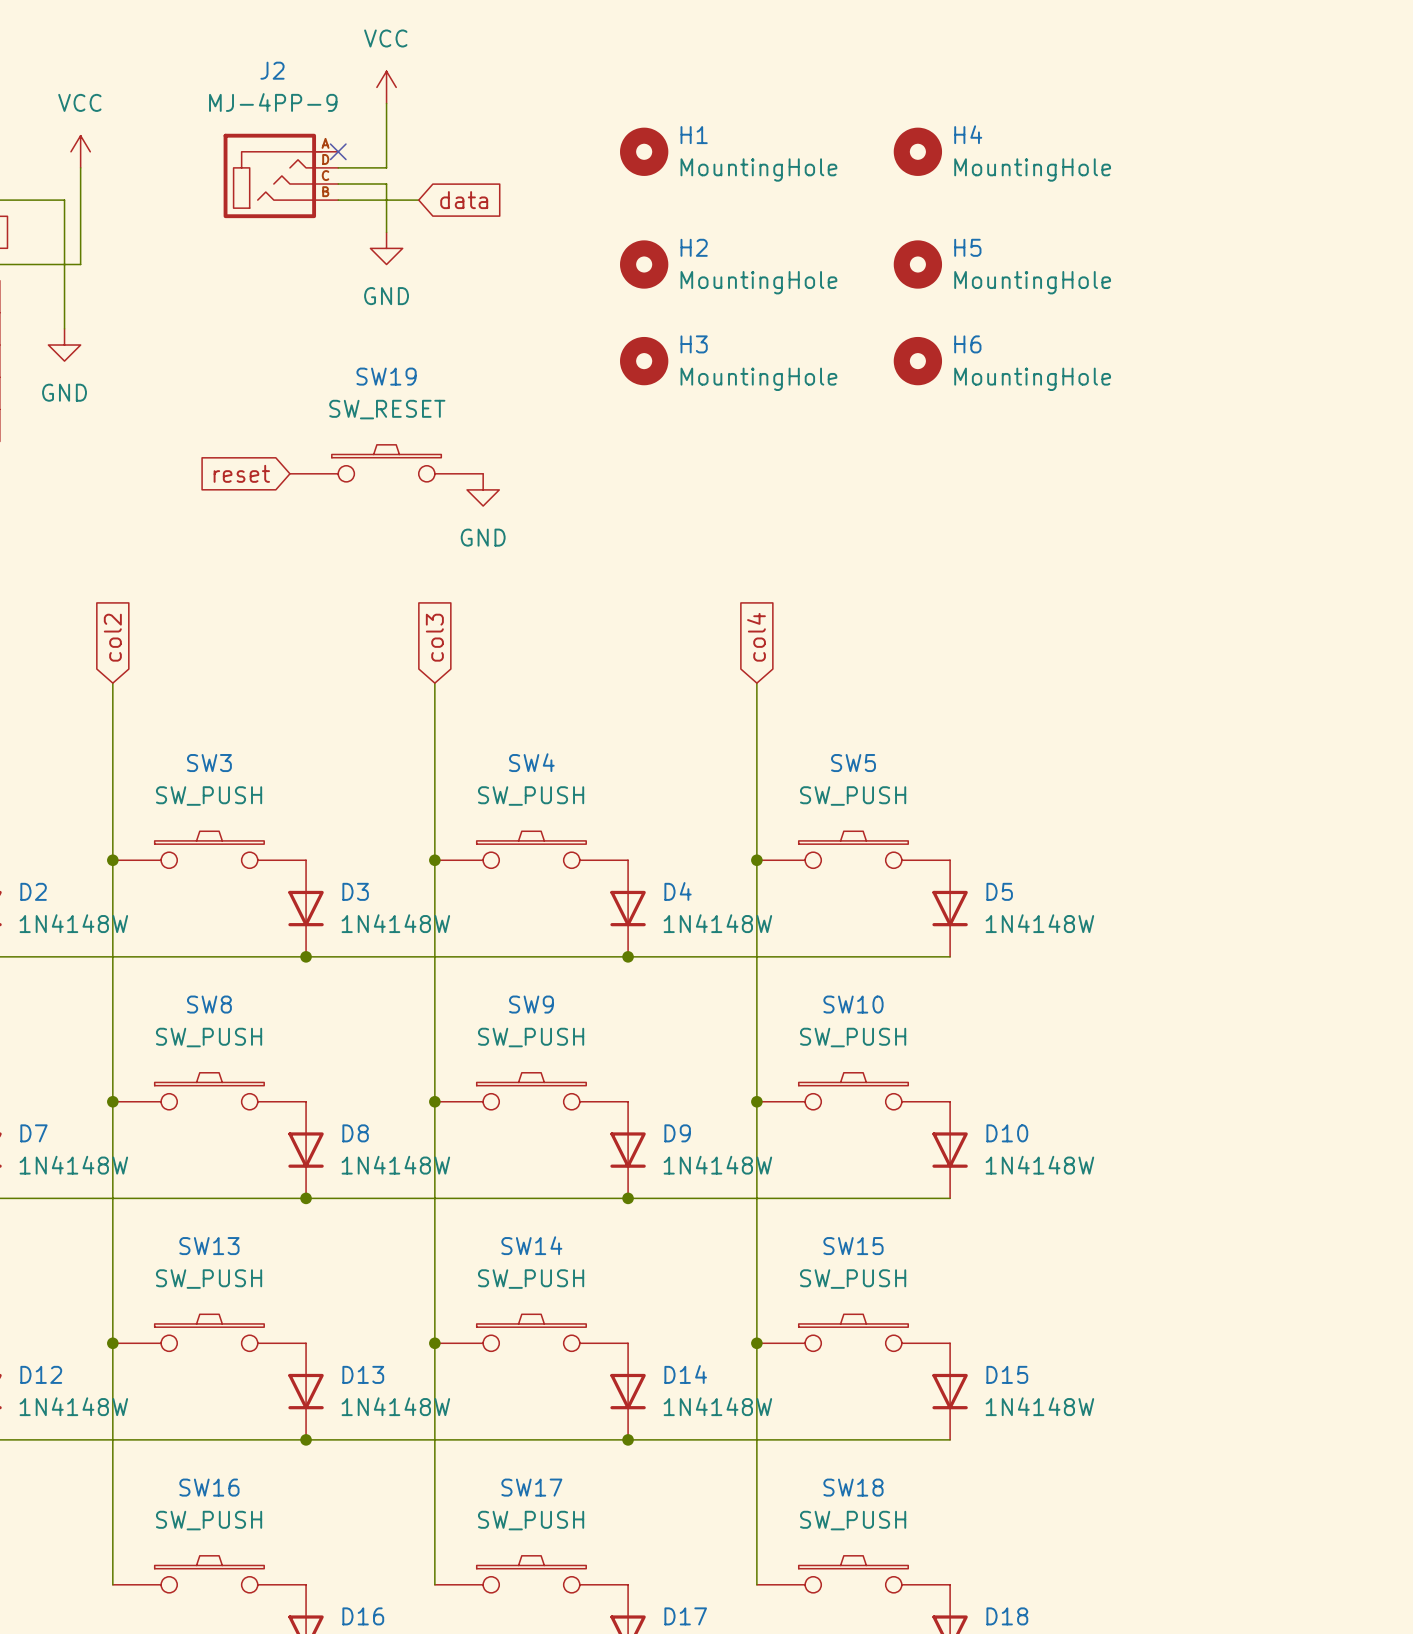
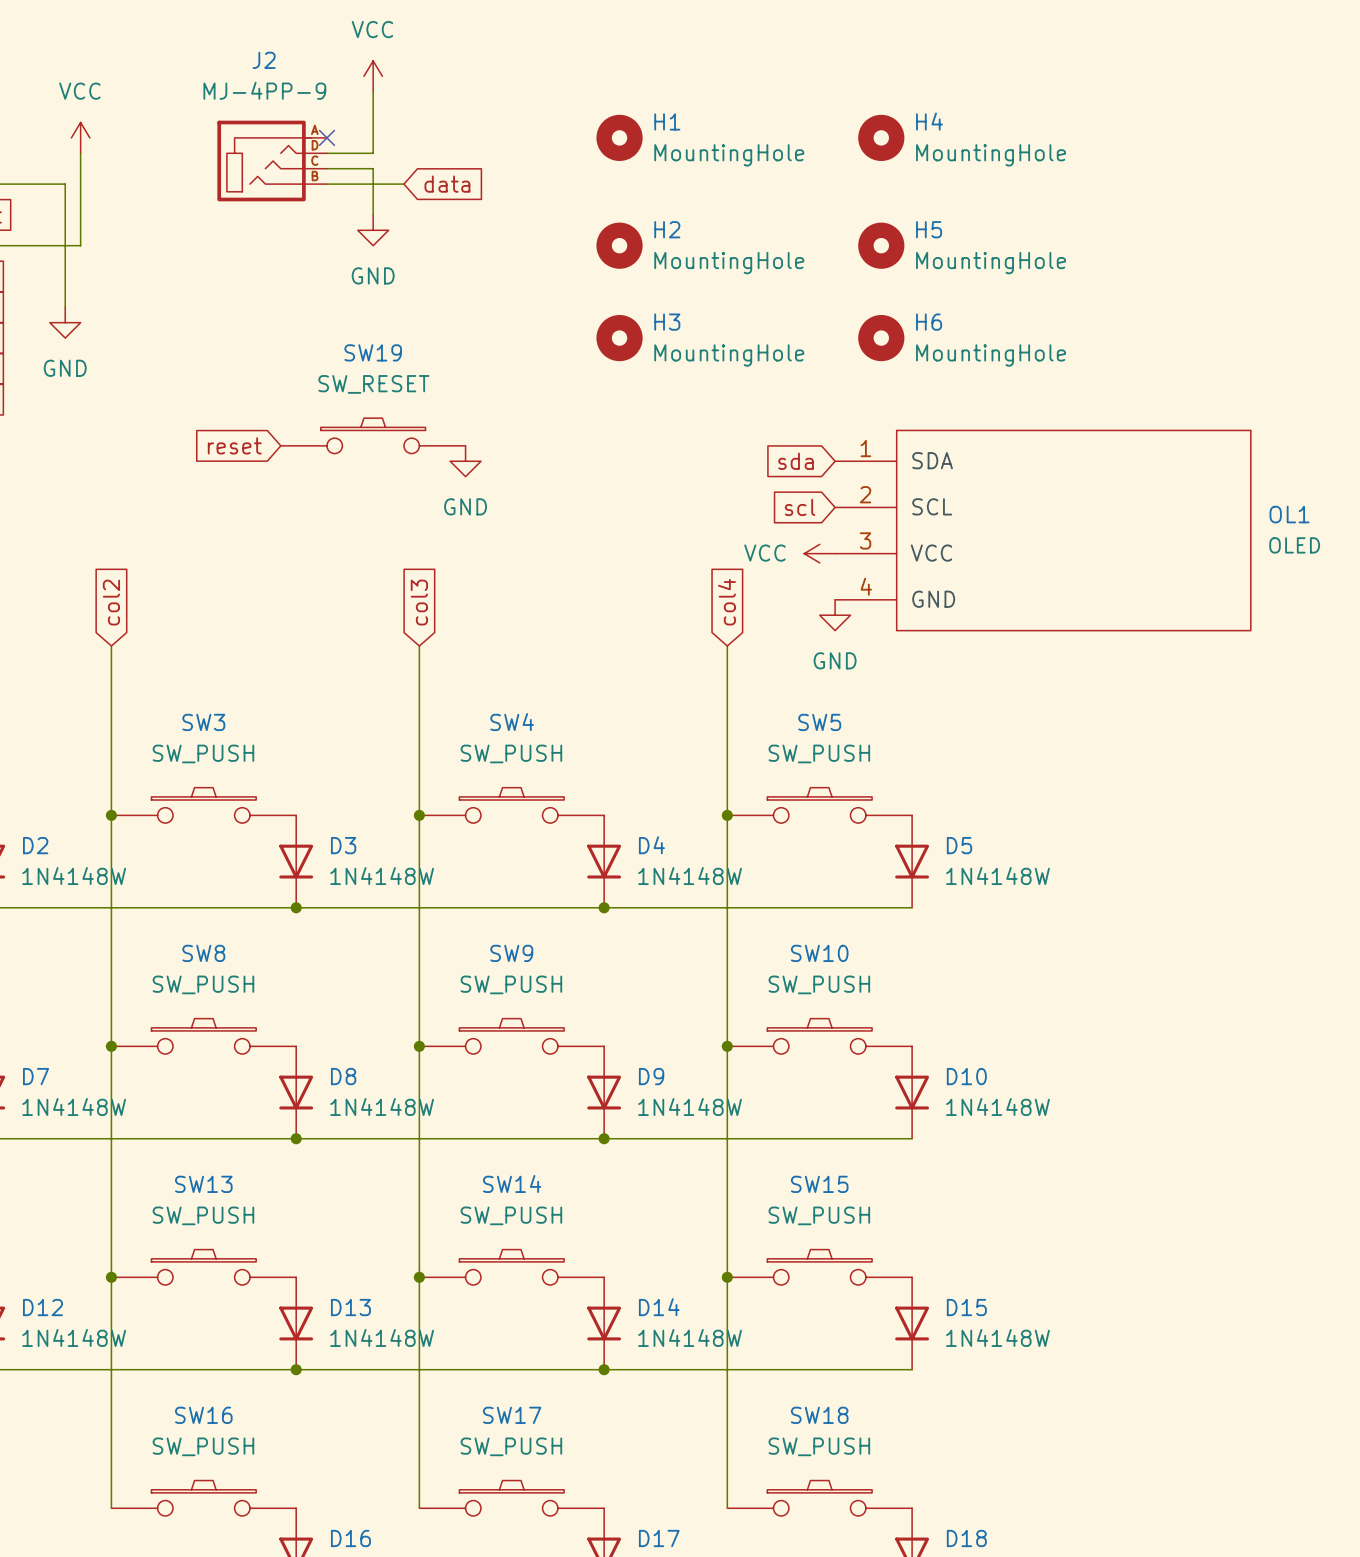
global label: none -> sda (796, 461)
global label: none -> scl (800, 507)
OL1: none -> OLED (1042, 530)
power symbol: none -> VCC (819, 553)
power symbol: none -> GND (835, 615)

